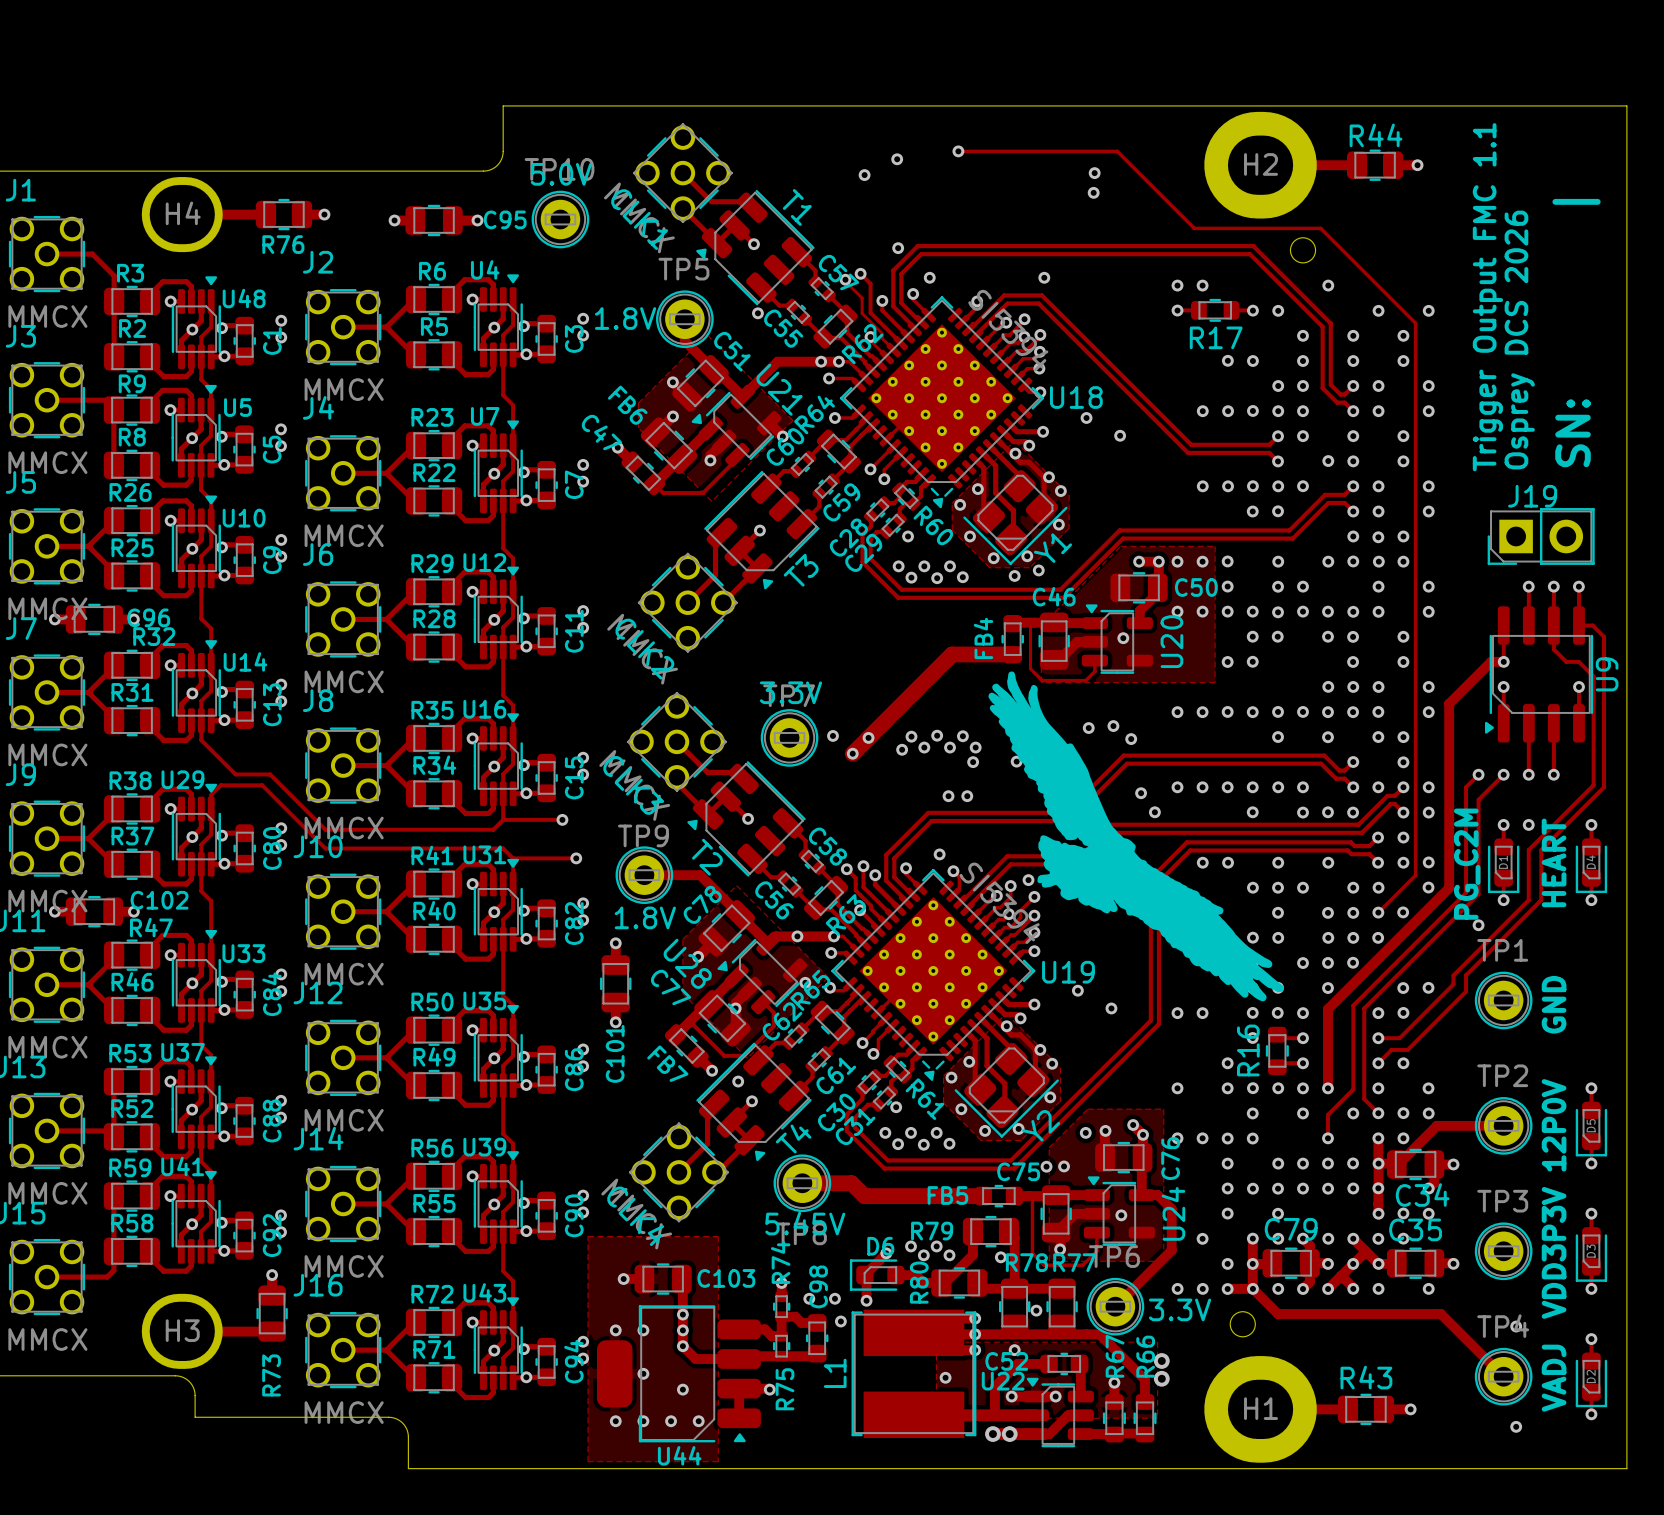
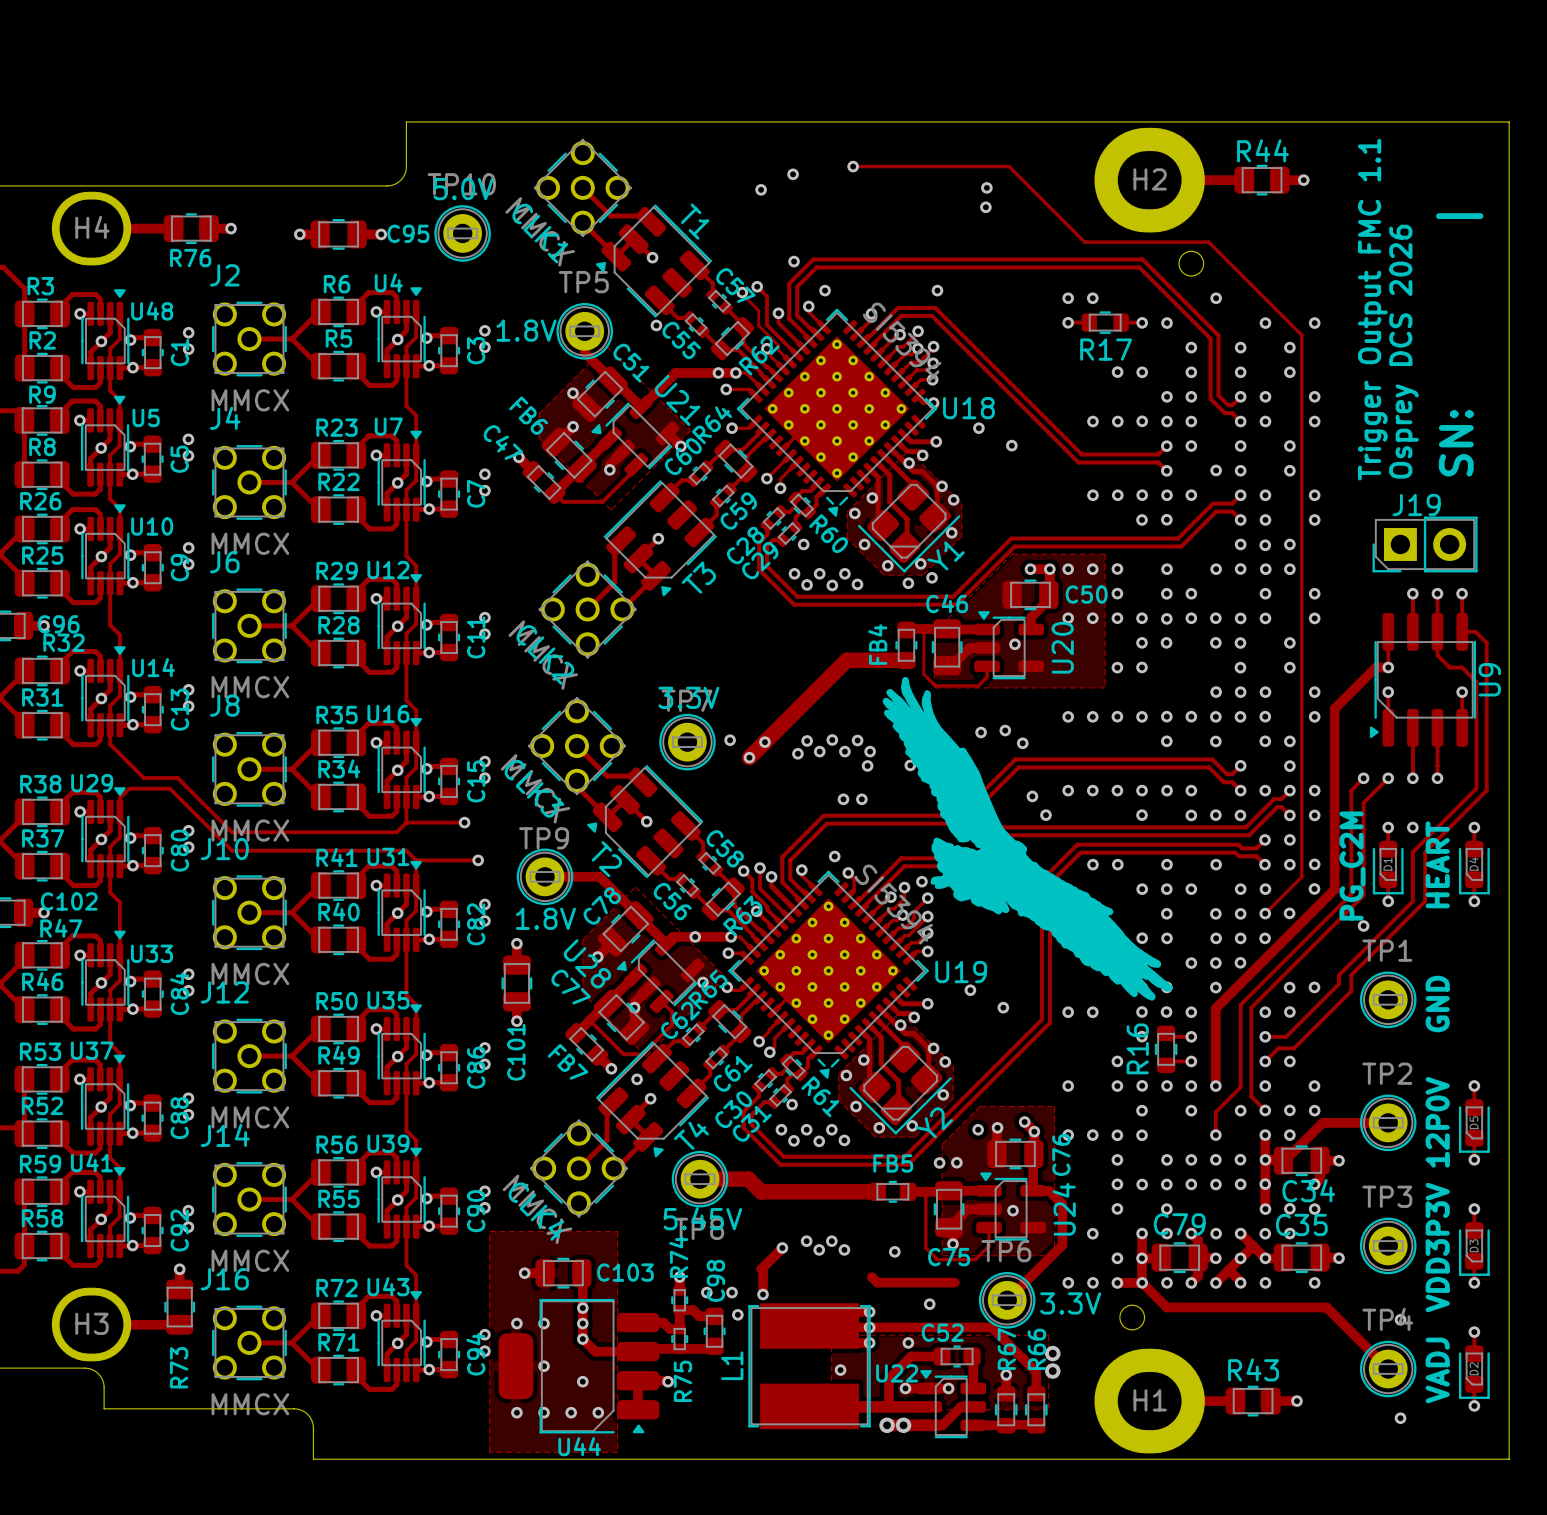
C75 name position: C75 (1018, 1171) -> C75 (949, 1257)
FB5 name position: FB5 (947, 1195) -> FB5 (893, 1163)
track: (972, 1231) (972, 1255) (945, 1282) (923, 1282) (915, 1275) (895, 1275) -> none
R79: (990, 1231) -> none
track: (1009, 1231) (1014, 1237) (1014, 1288) -> none
D6: (877, 1275) -> none
R80: (959, 1282) -> none
R78: (1014, 1306) -> none
R77: (1062, 1306) -> none
C52 name position: C52 (1006, 1361) -> C52 (942, 1332)

